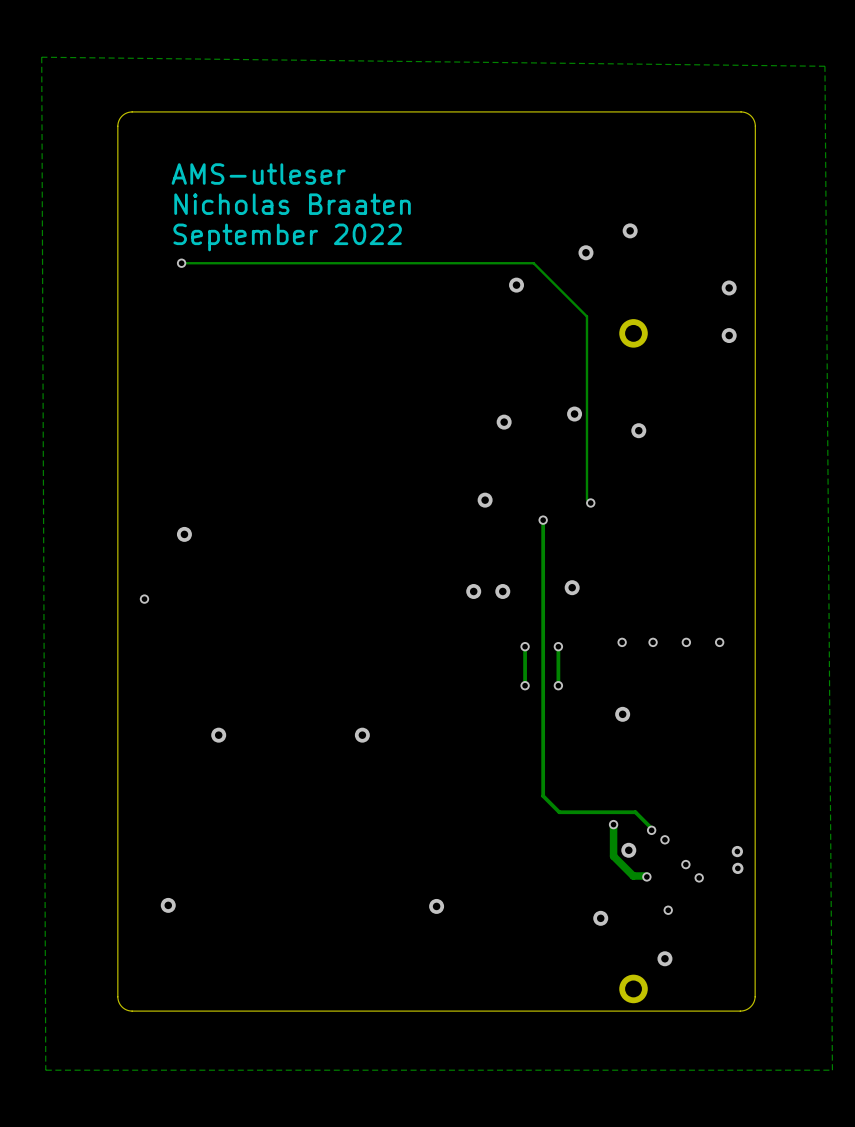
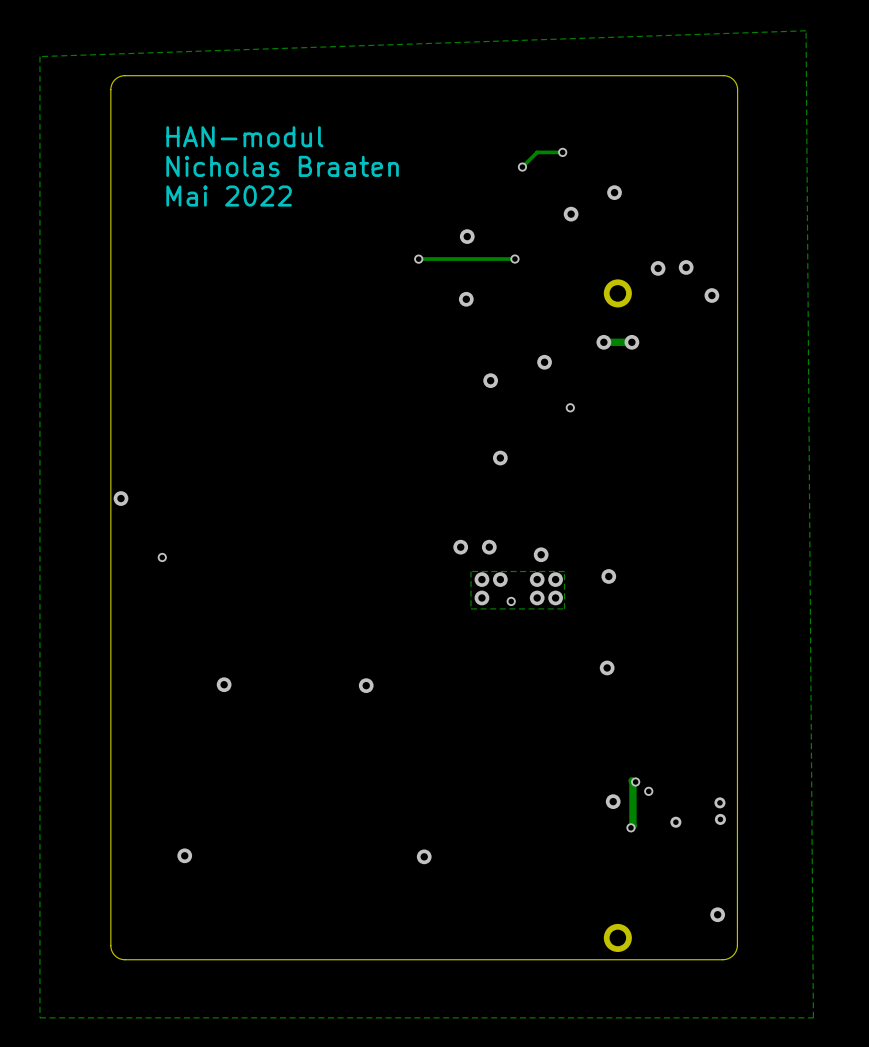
zone outline: (824, 66) (41, 57) (45, 1070) -> (806, 30) (39, 56) (39, 1017)
text: AMS-utleser (258, 174) -> HAN-modul (244, 136)
track: none -> (562, 152) (537, 152) (522, 167)
via: none -> (562, 152)
via: none -> (522, 167)
text: September 2022 (287, 237) -> Mai 2022 (229, 196)
track: (181, 263) (533, 263) (586, 316) (586, 499) (590, 503) -> none
via: (181, 263) -> none
via: none -> (467, 236)
via: (516, 285) -> none
via: (729, 287) -> none
via: none -> (418, 259)
track: none -> (514, 259) (418, 259)
via: none -> (514, 259)
via: none -> (686, 267)
via: none -> (658, 268)
via: none -> (466, 299)
via: none -> (603, 342)
track: none -> (631, 342) (603, 342)
via: none -> (631, 342)
via position: (574, 414) -> (544, 362)
via: (638, 430) -> none
via: none -> (570, 407)
via position: (485, 500) -> (500, 458)
via: (590, 503) -> none
track: (543, 520) (543, 796) (559, 812) (635, 812) (652, 829) -> none
via: (543, 520) -> none
via position: (184, 534) -> (121, 498)
via: (572, 587) -> none
via position: (144, 599) -> (162, 557)
via: none -> (541, 554)
zone outline: none -> (564, 571) (564, 608) (471, 608) (471, 571) (564, 571)
via: none -> (608, 576)
via: none -> (481, 579)
via: none -> (500, 579)
via: none -> (537, 579)
via: none -> (555, 579)
via: (622, 642) -> none
via: (653, 642) -> none
via: (686, 642) -> none
via: (719, 642) -> none
via: none -> (481, 597)
via: none -> (537, 597)
via: none -> (555, 597)
track: (525, 646) (525, 685) -> none
track: (558, 646) (558, 685) -> none
via: (558, 646) -> none
via: (525, 685) -> none
via: (558, 685) -> none
via position: (218, 735) -> (224, 684)
via position: (362, 735) -> (366, 685)
track: (613, 824) (613, 856) (633, 875) (646, 875) -> none
via: (613, 824) -> none
track: none -> (632, 780) (632, 826)
via: (685, 864) -> none
via: none -> (675, 822)
via: (699, 877) -> none
via position: (168, 905) -> (184, 855)
via: (668, 910) -> none
via: (600, 918) -> none
via position: (664, 958) -> (717, 914)

